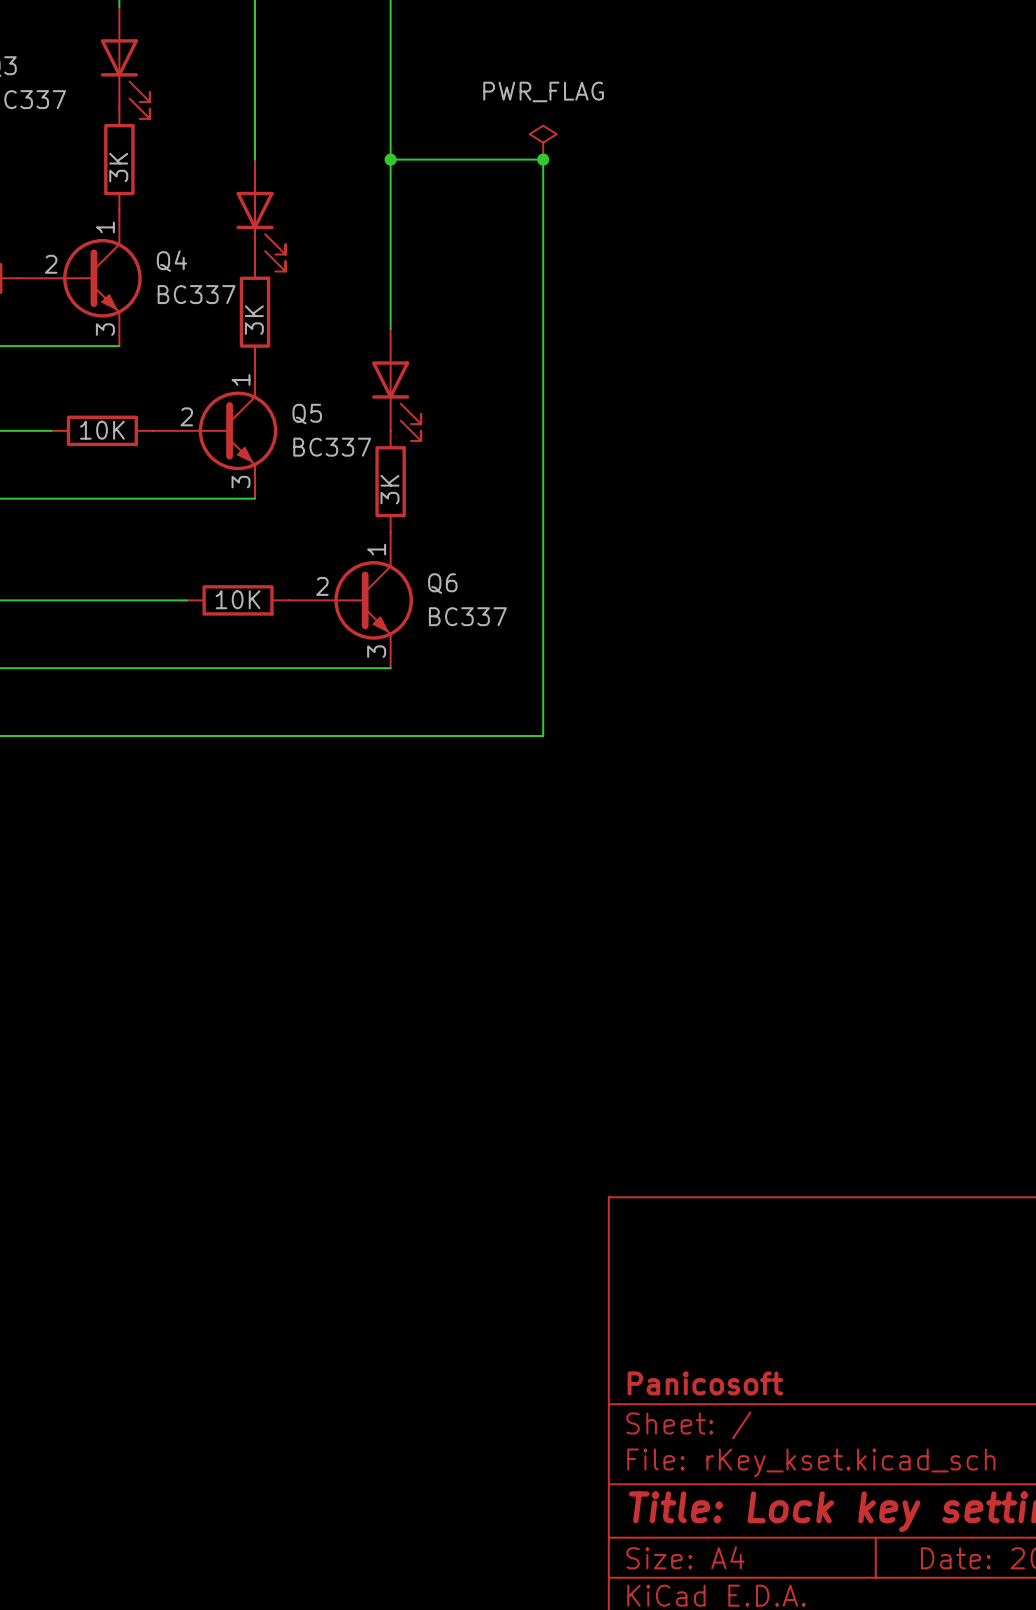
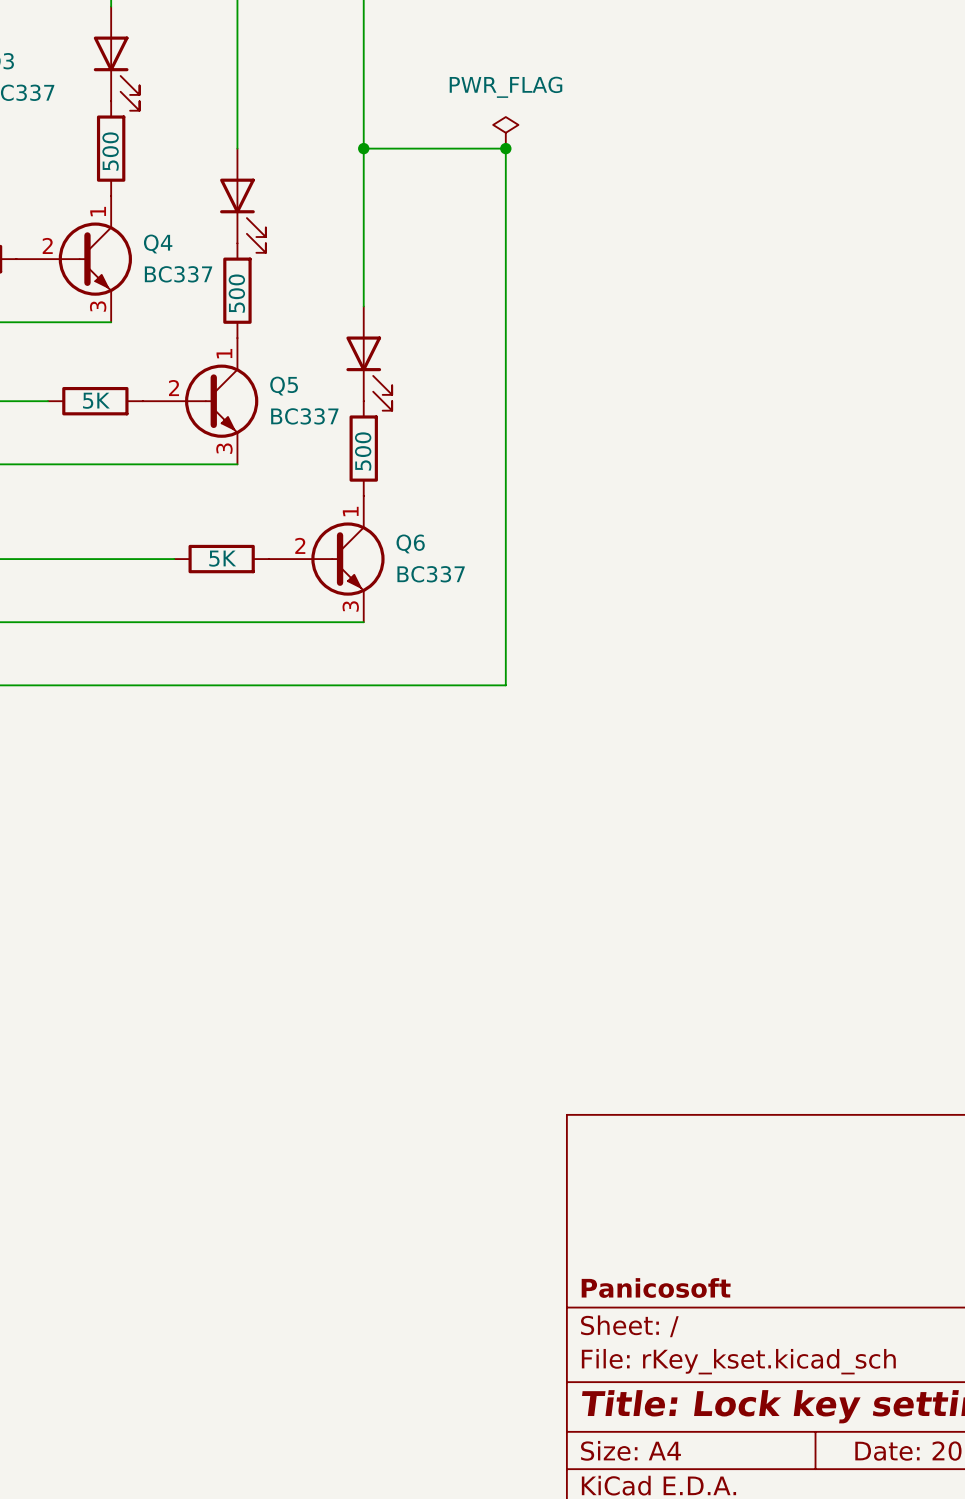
part value: 3K (118, 167) -> 500 (110, 151)
part value: 3K (254, 320) -> 500 (236, 293)
part value: 10K (102, 430) -> 5K (96, 400)
part value: 3K (389, 489) -> 500 (363, 451)
part value: 10K (238, 599) -> 5K (222, 558)

